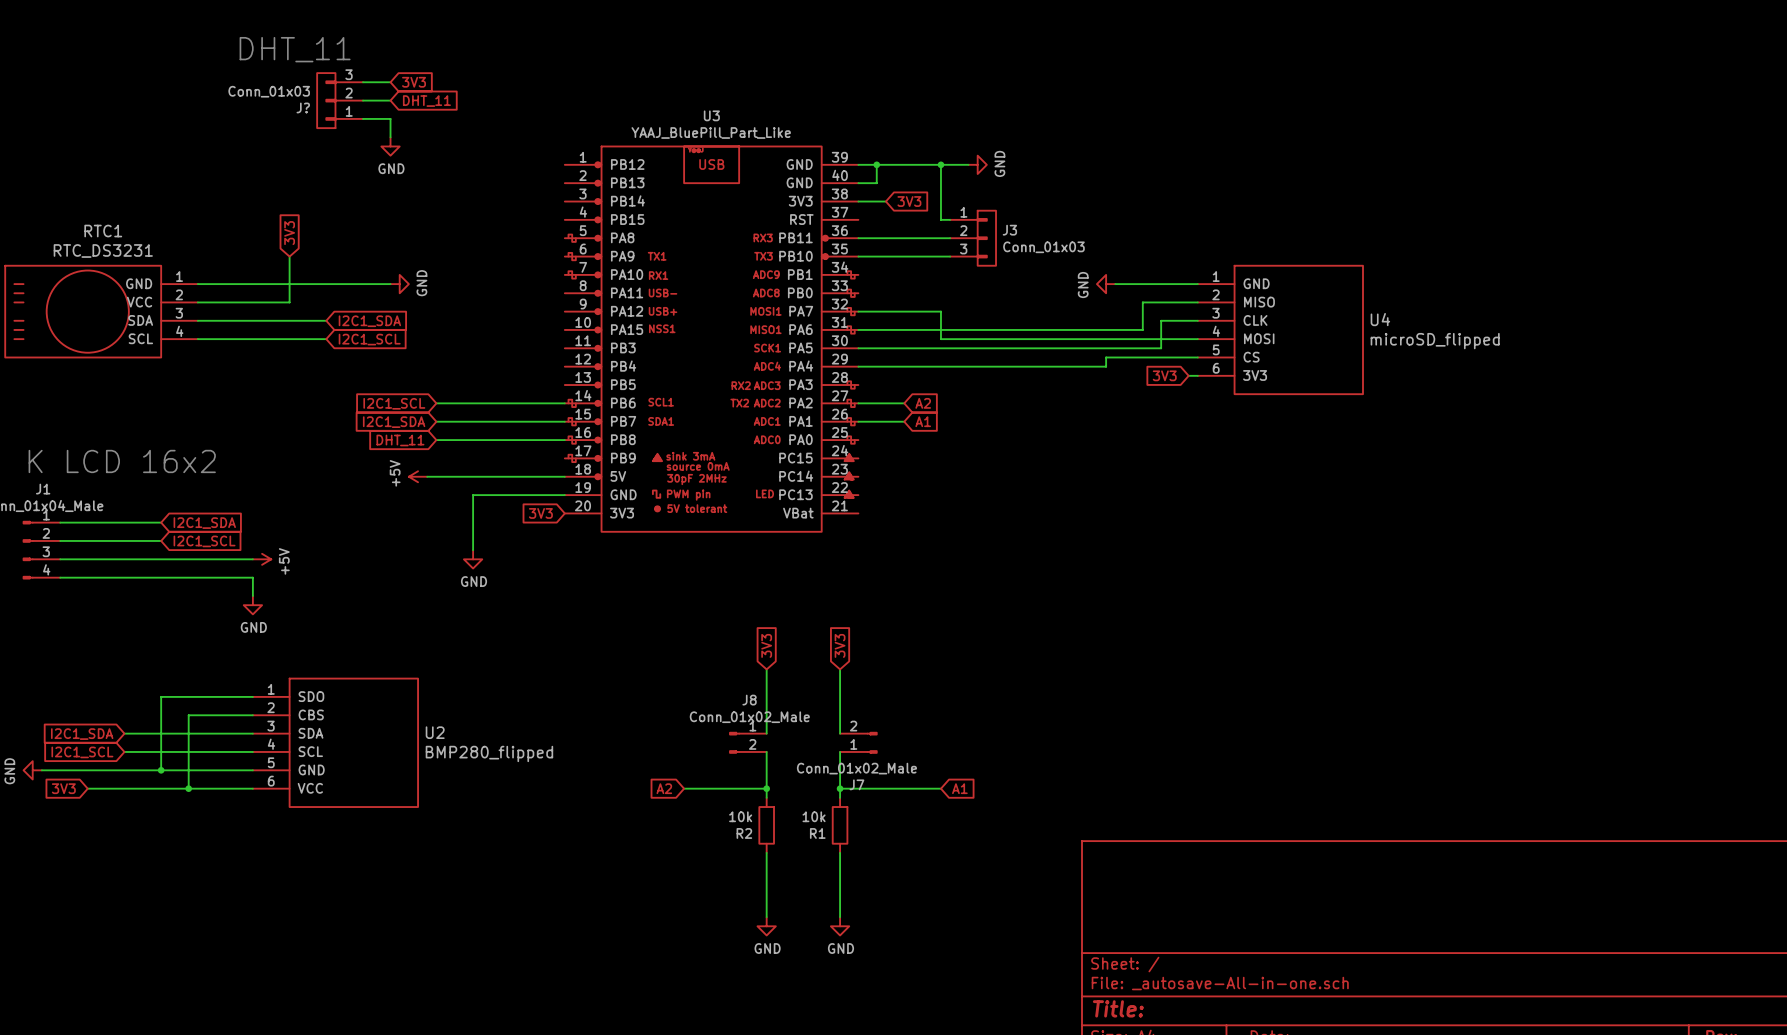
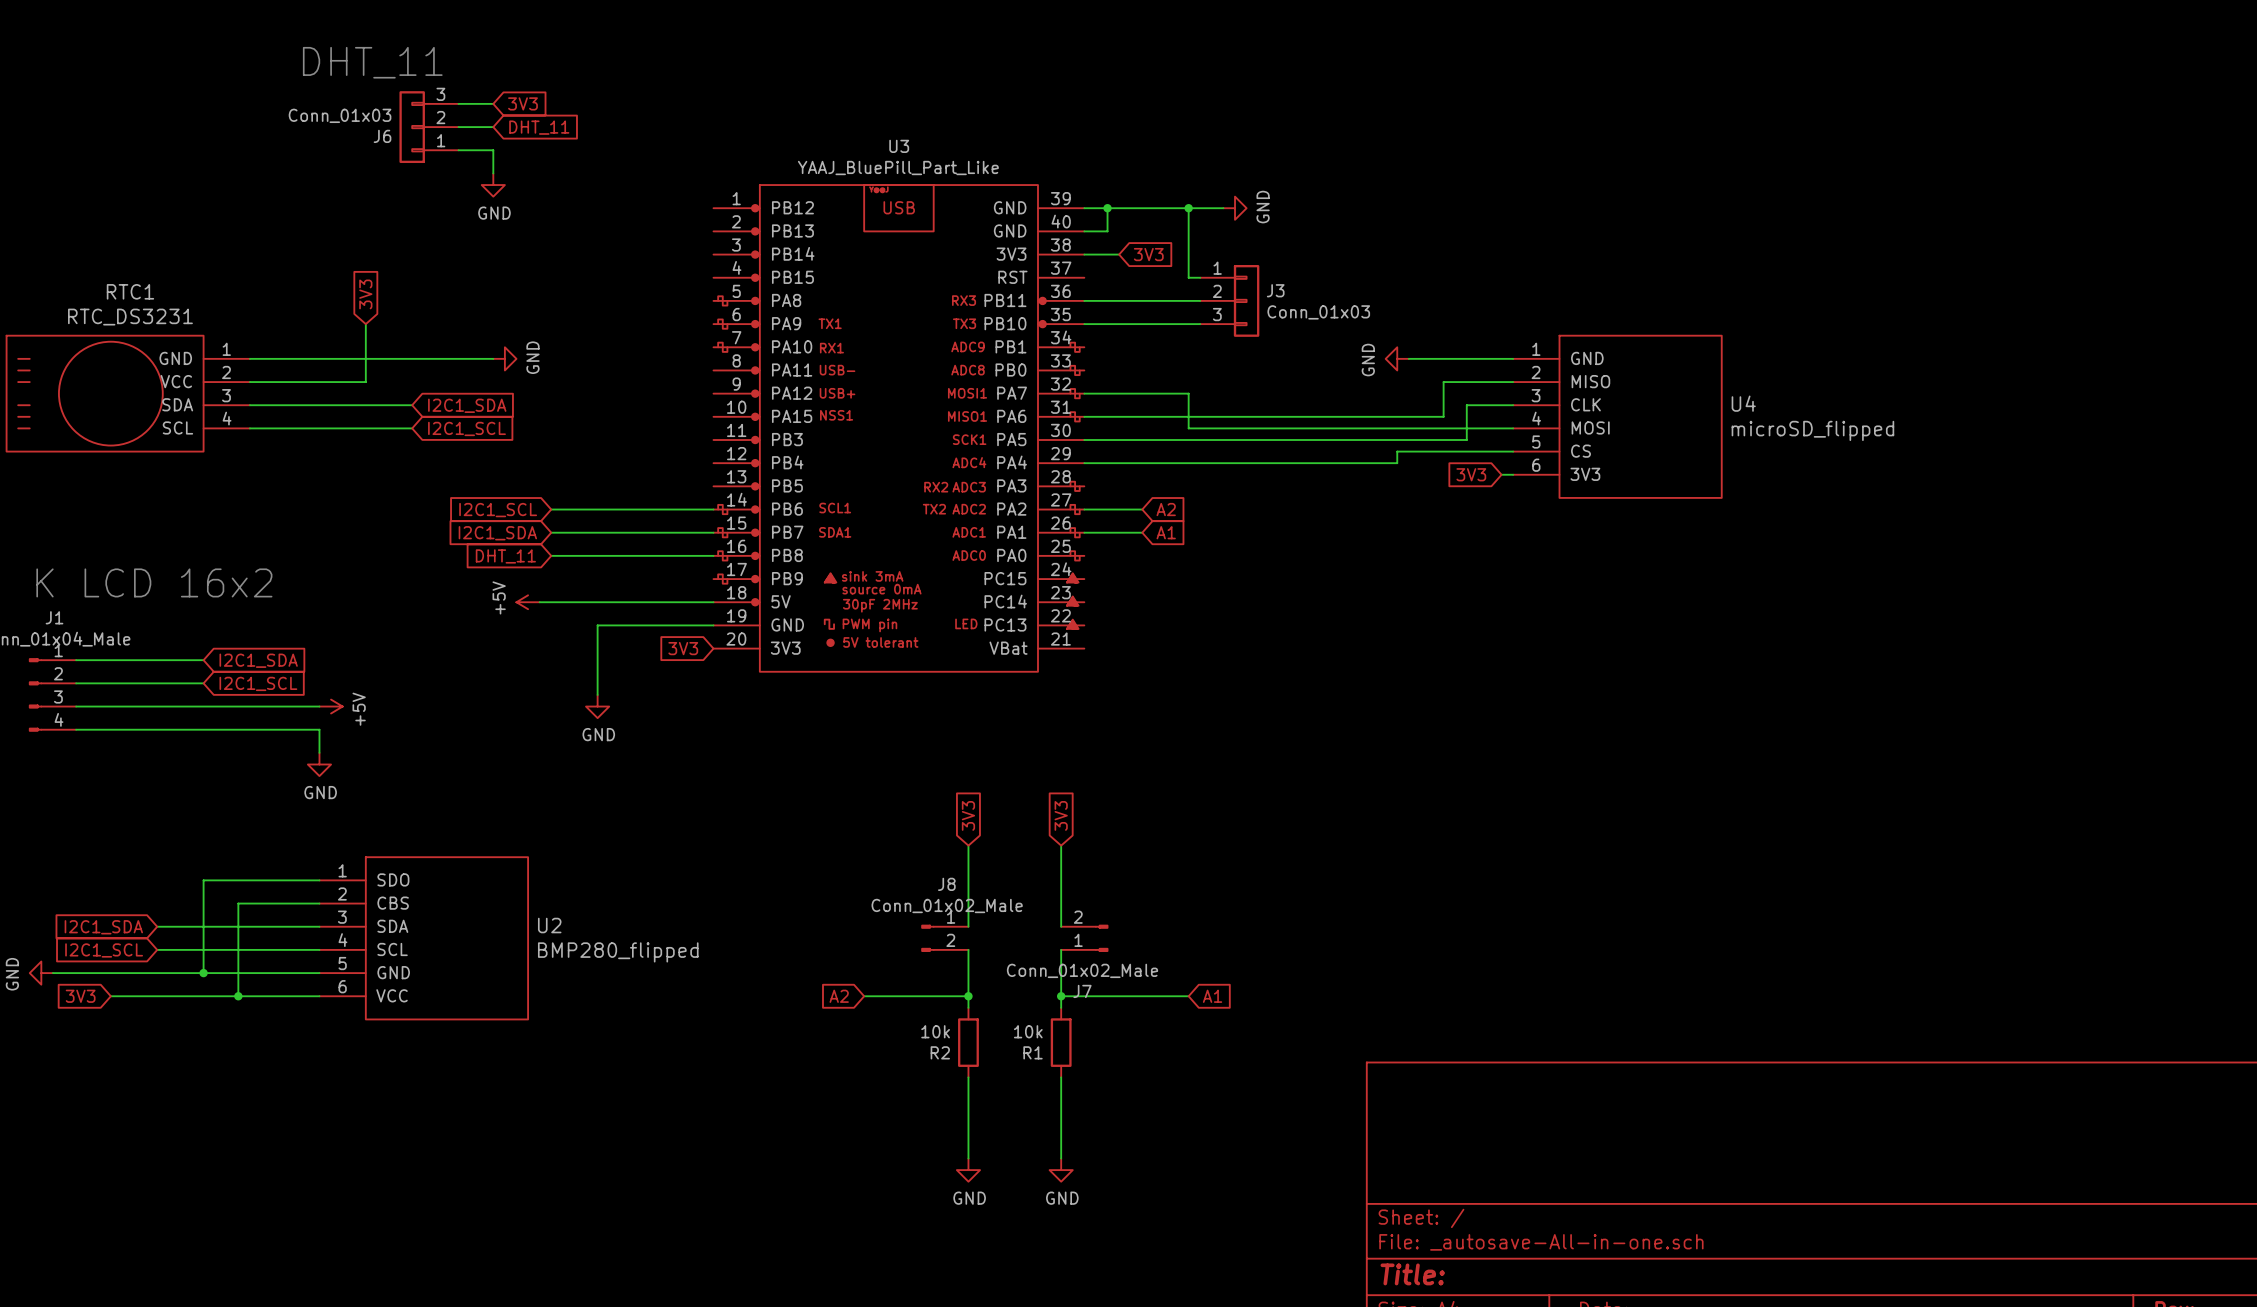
J? name: J? (303, 107) -> J6 (382, 136)

